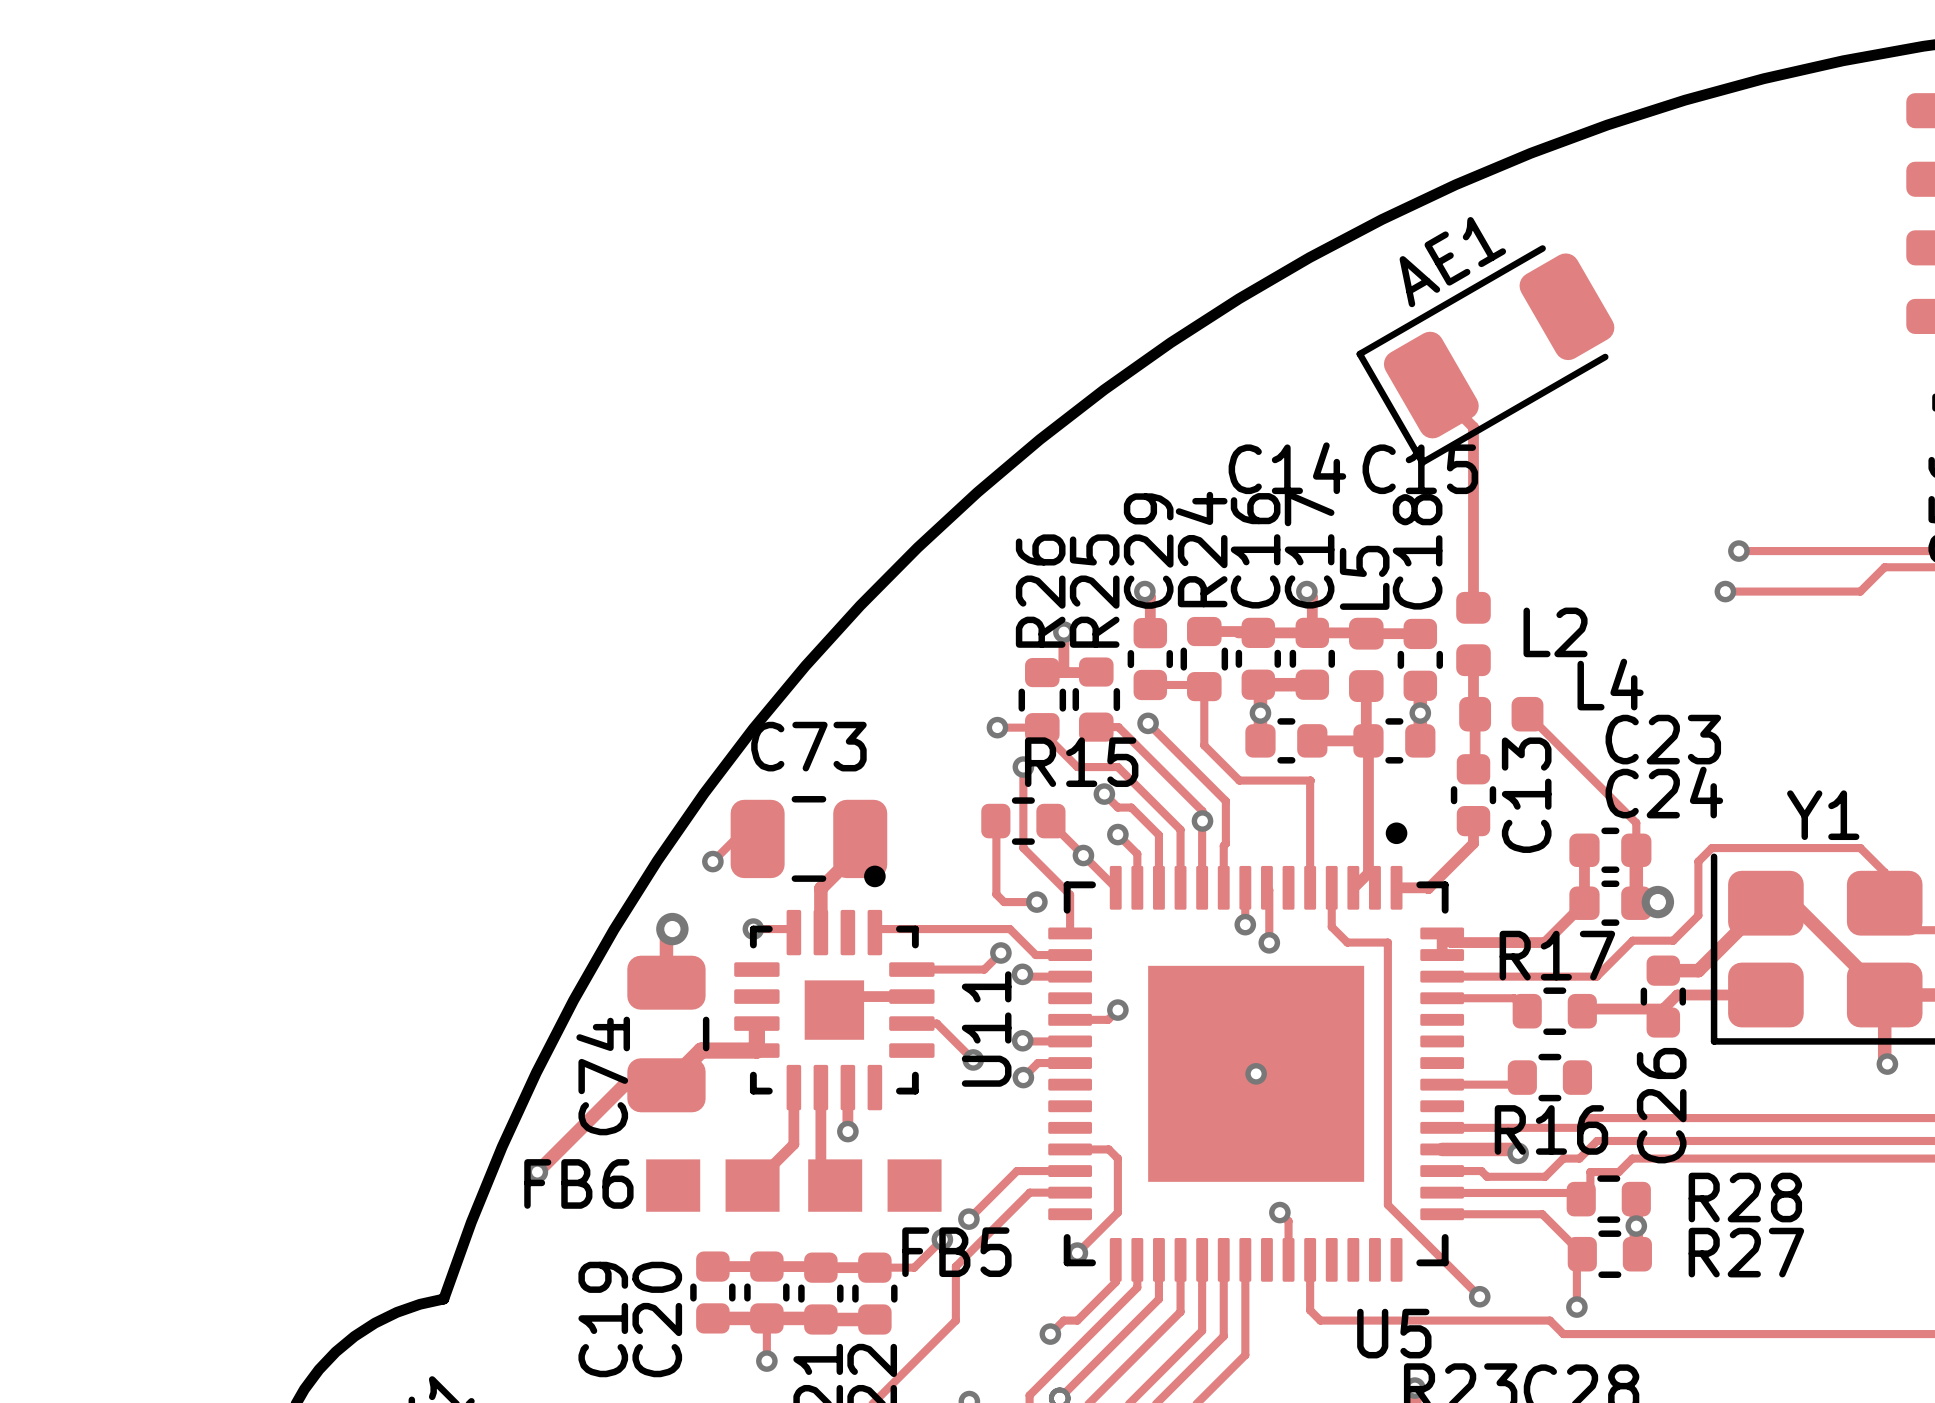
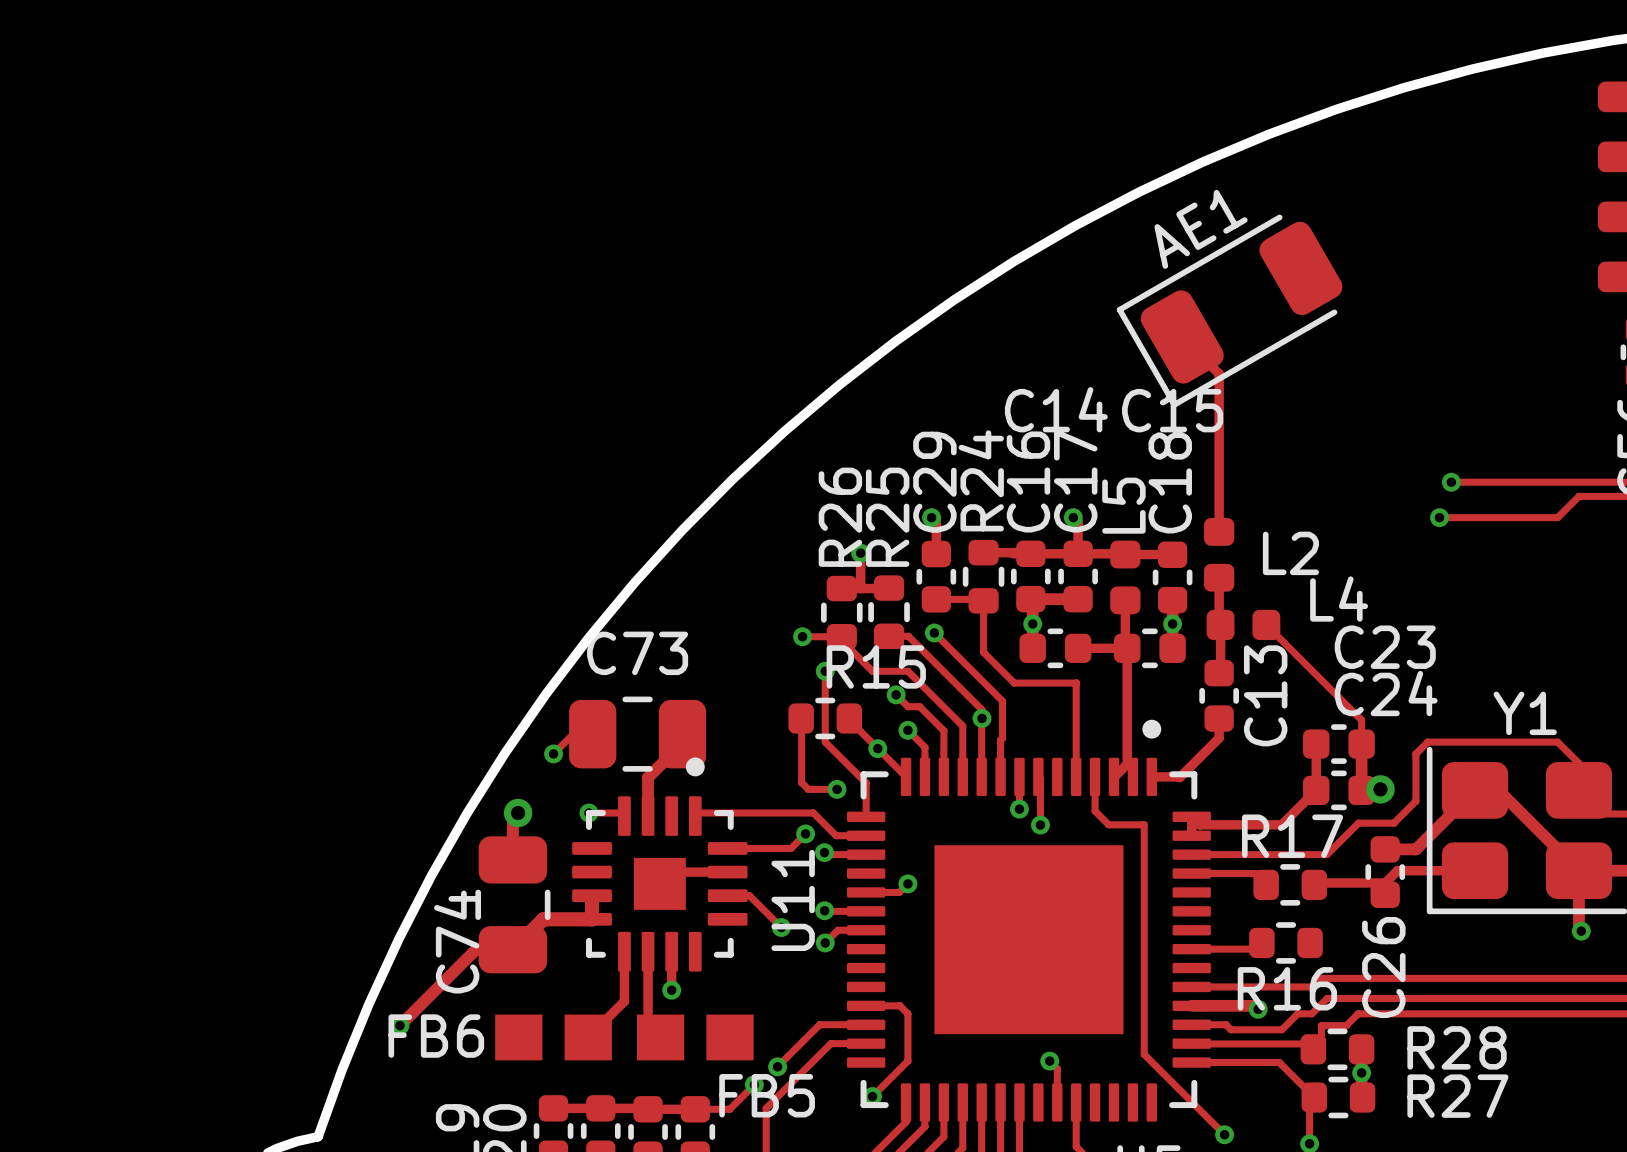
via: (1256, 1073) -> none

